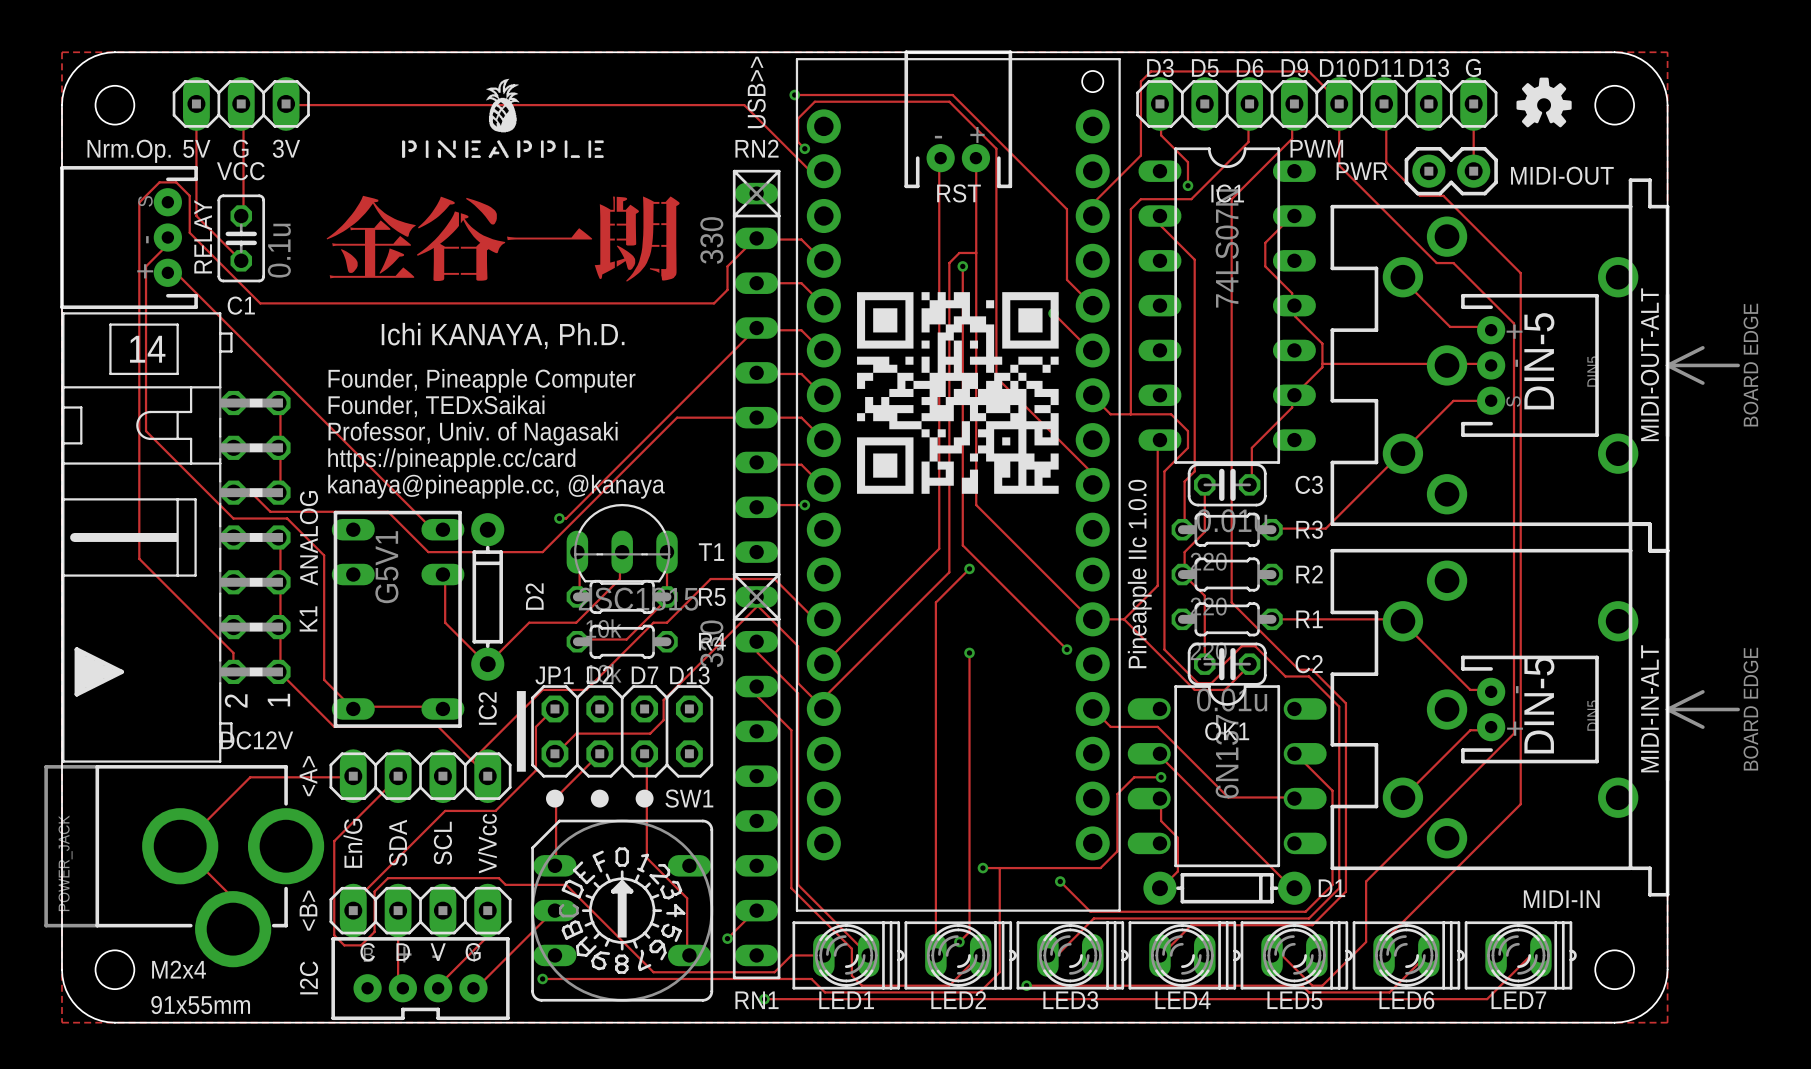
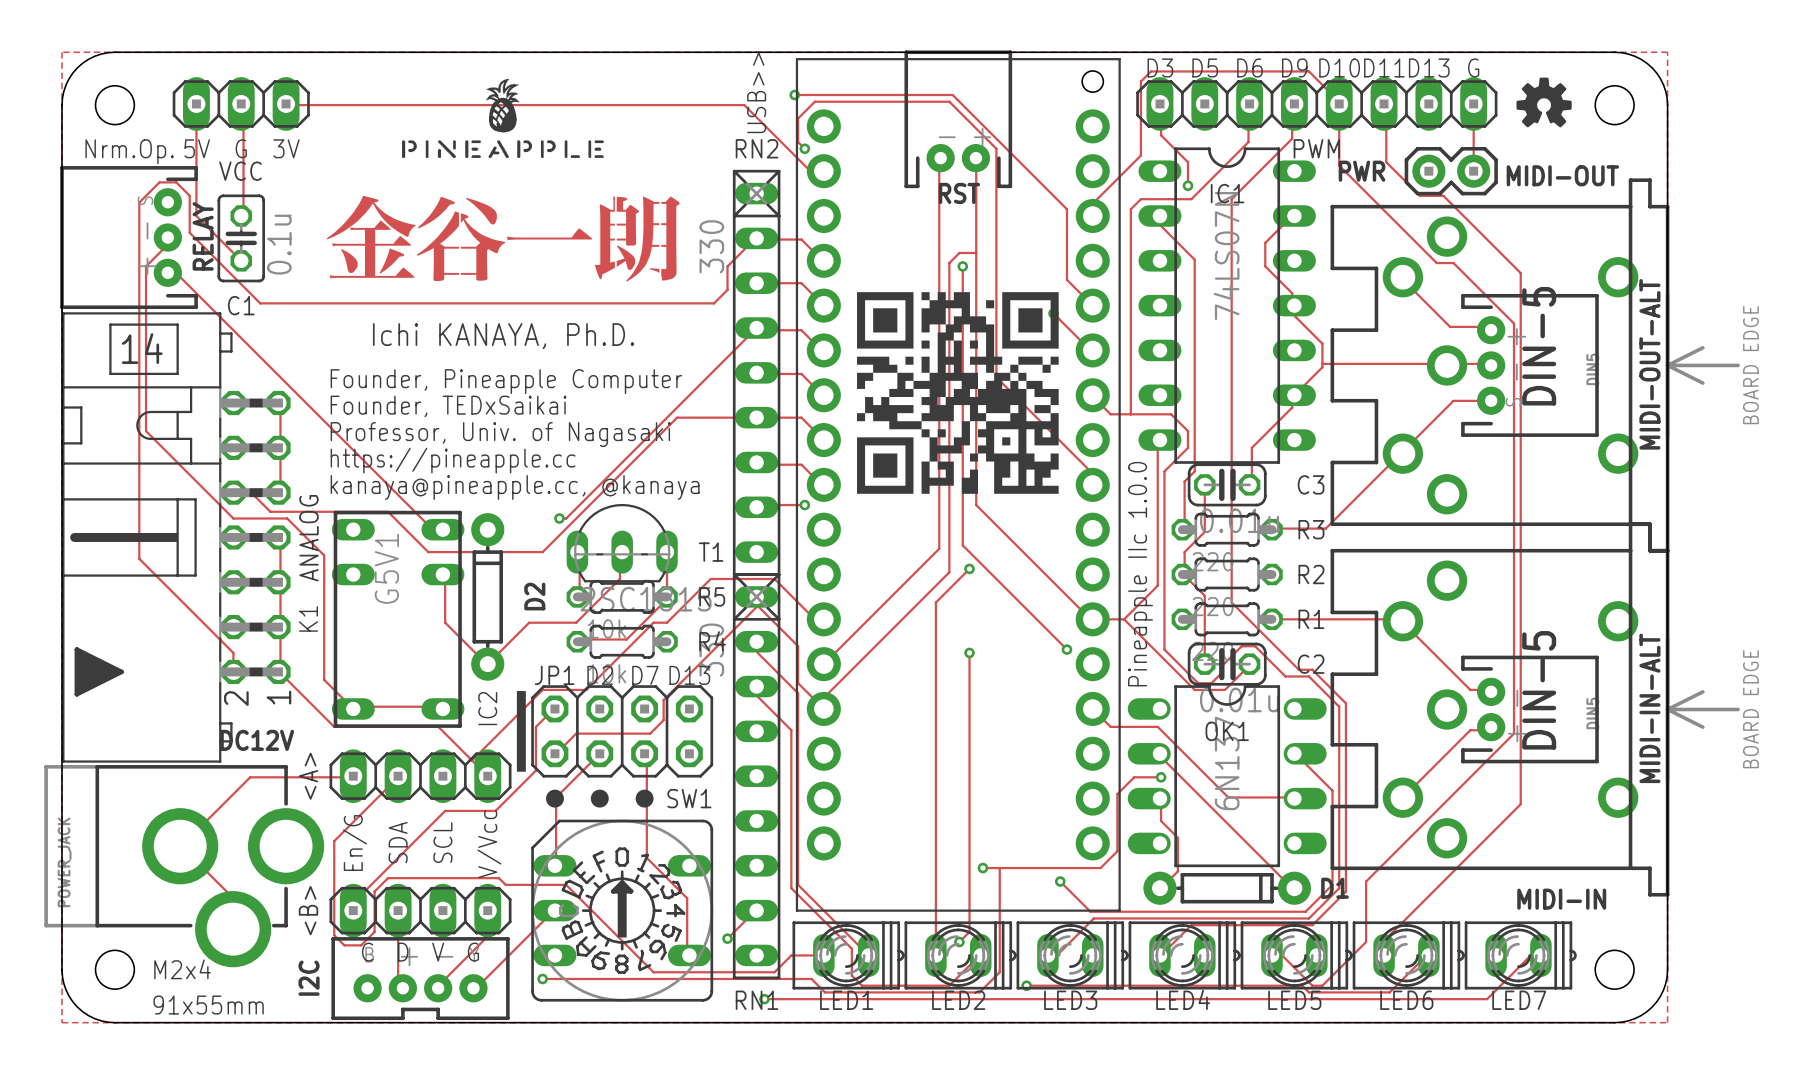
text: https://pineapple.cc/card (451, 460) -> https://pineapple.cc (453, 460)

